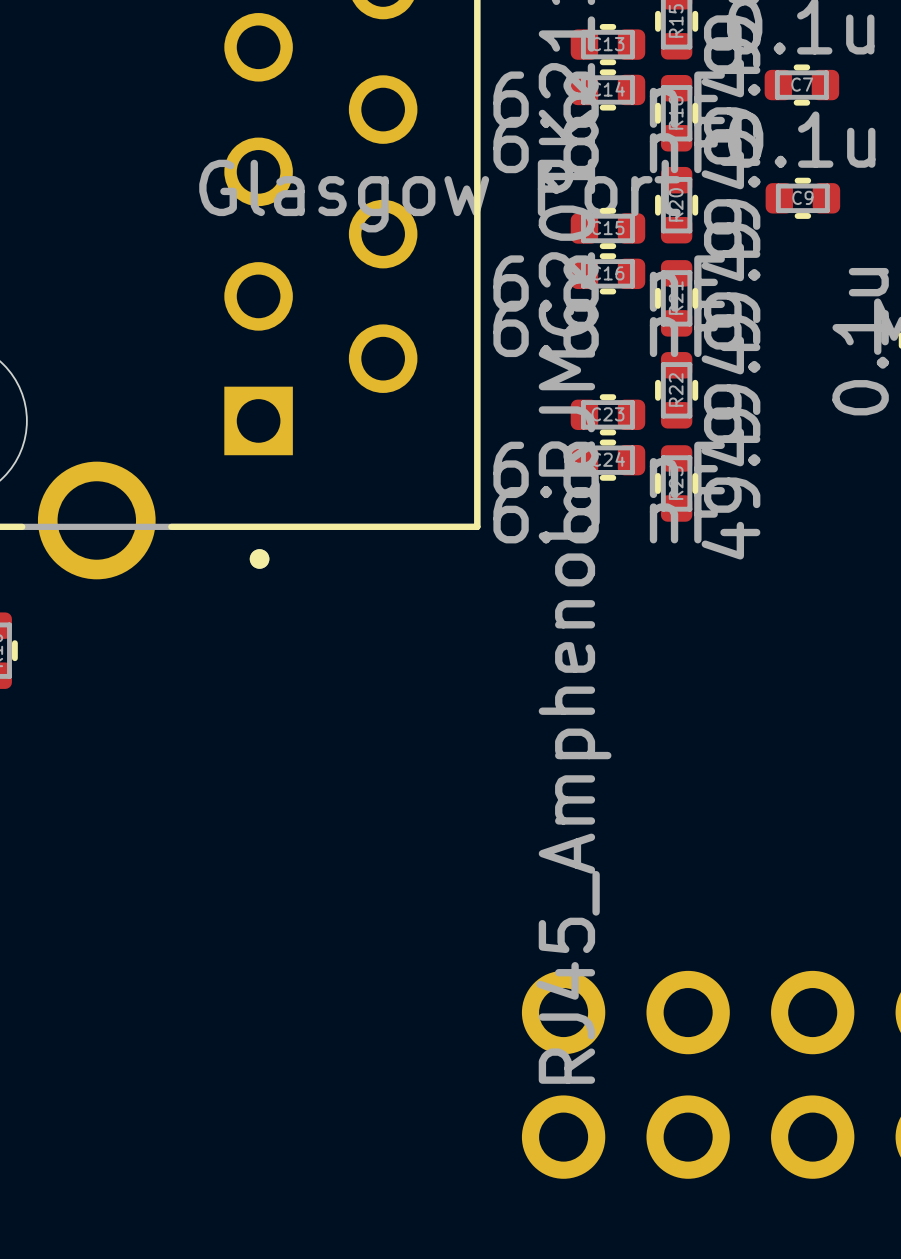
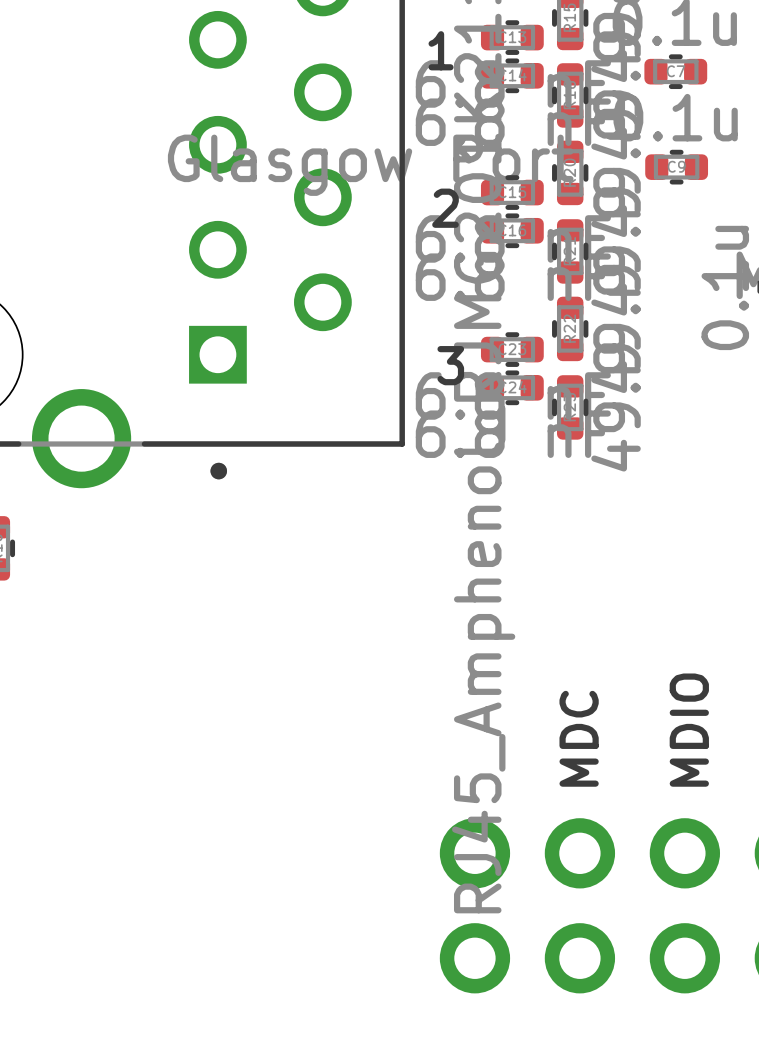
text: none -> 1 (441, 50)
text: none -> 2 (445, 208)
text: none -> 3 (450, 365)
text: none -> MDIO (689, 730)
text: none -> MDC (579, 738)

